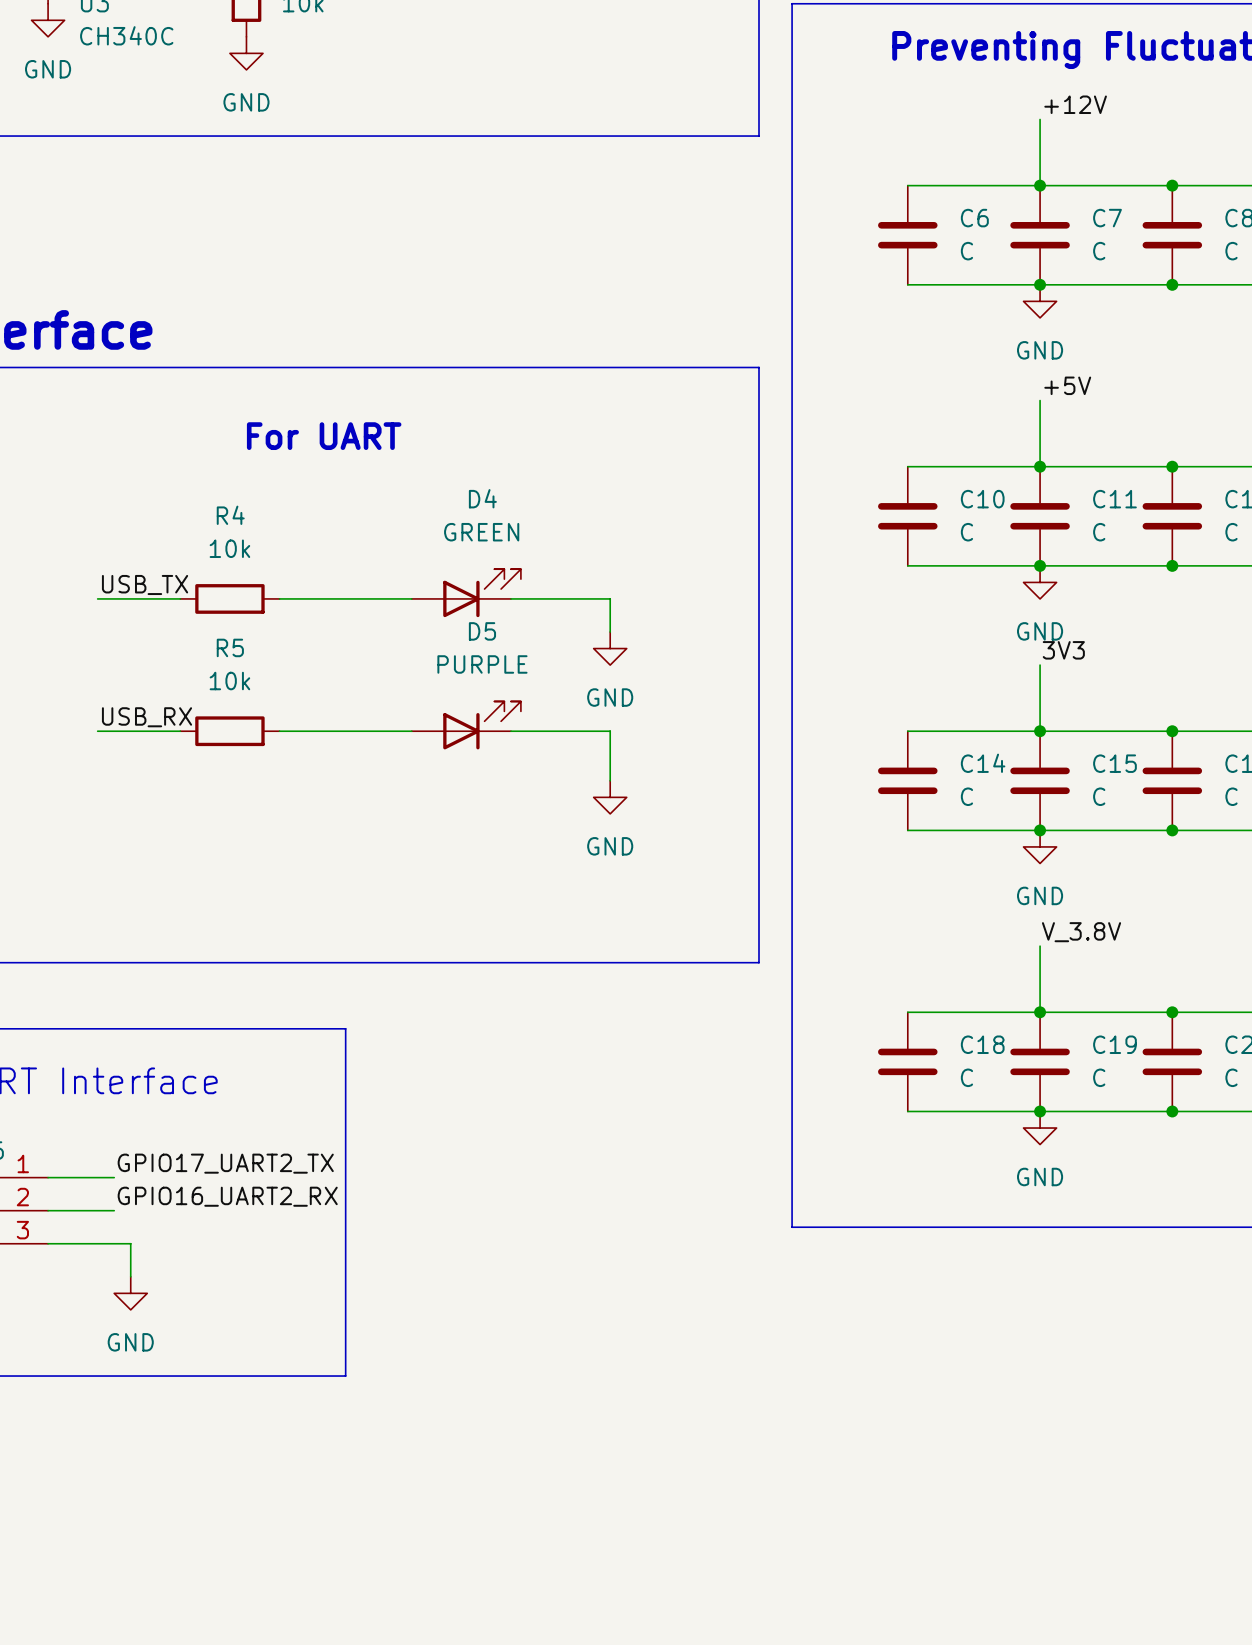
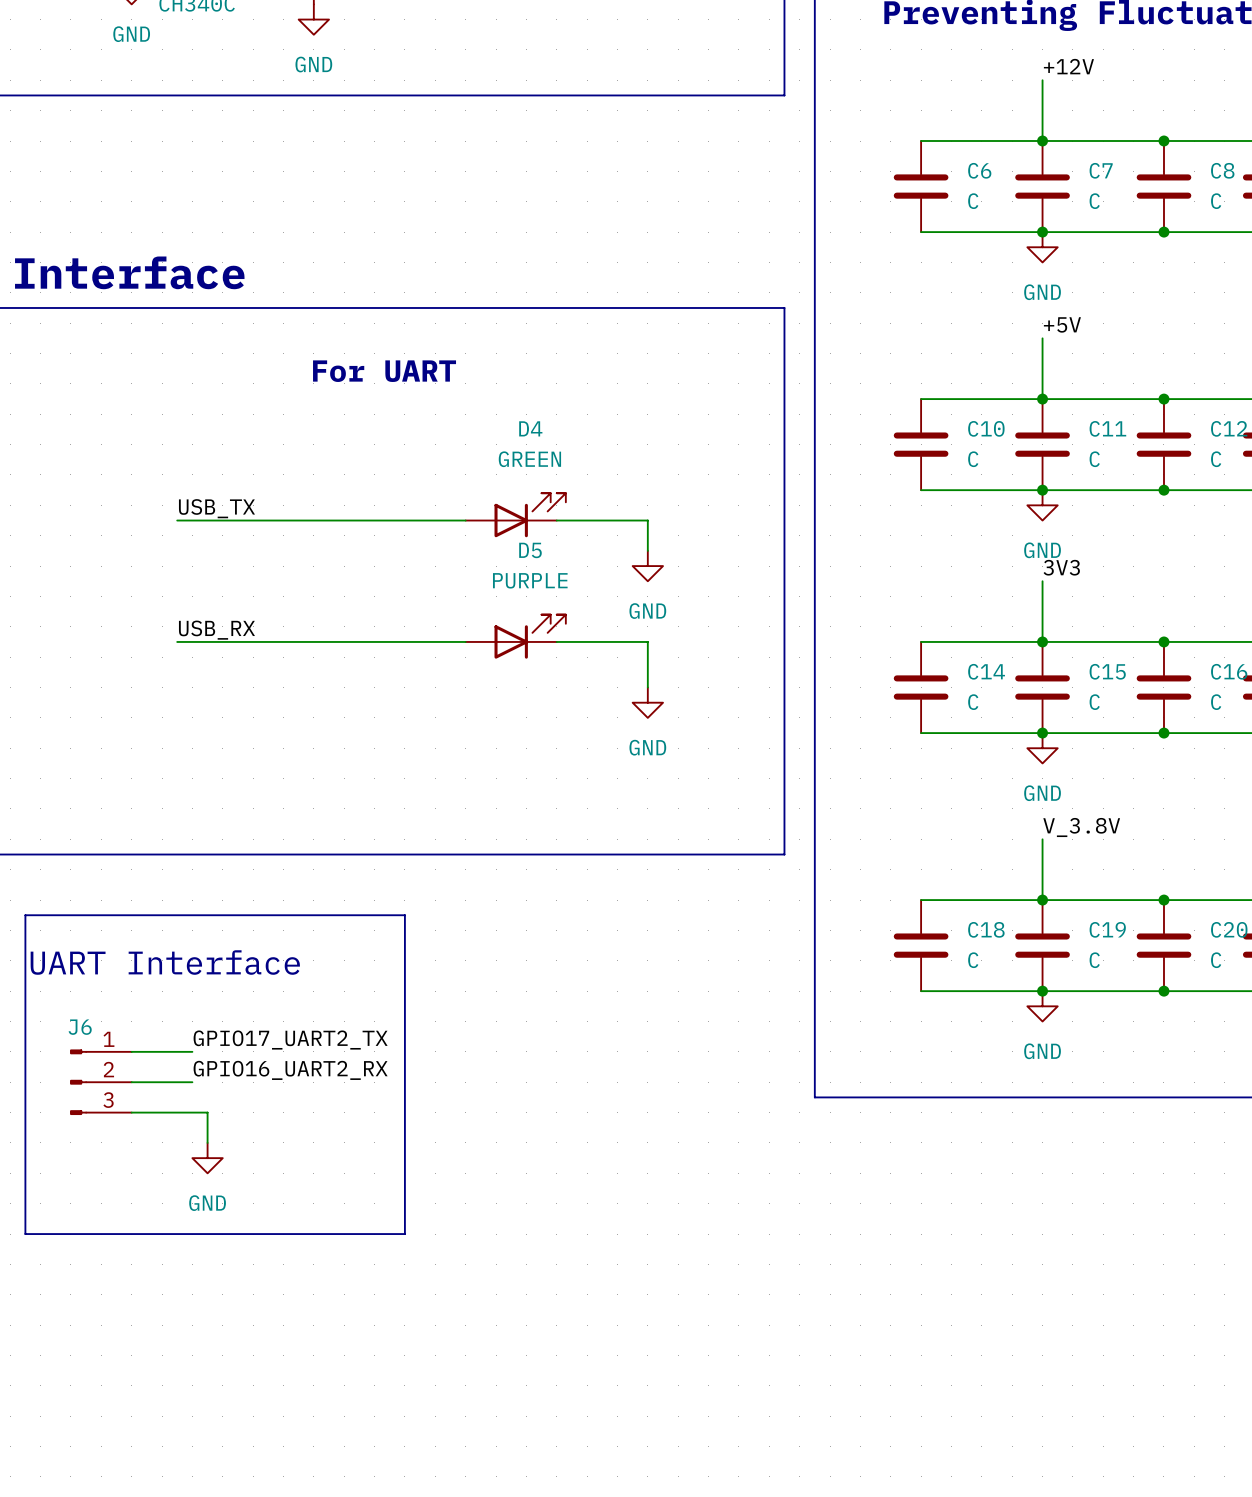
wire: none -> (253, 520) (344, 520)
R4: 10k (229, 598) -> none
wire: none -> (253, 641) (344, 641)
R5: 10k (229, 731) -> none

